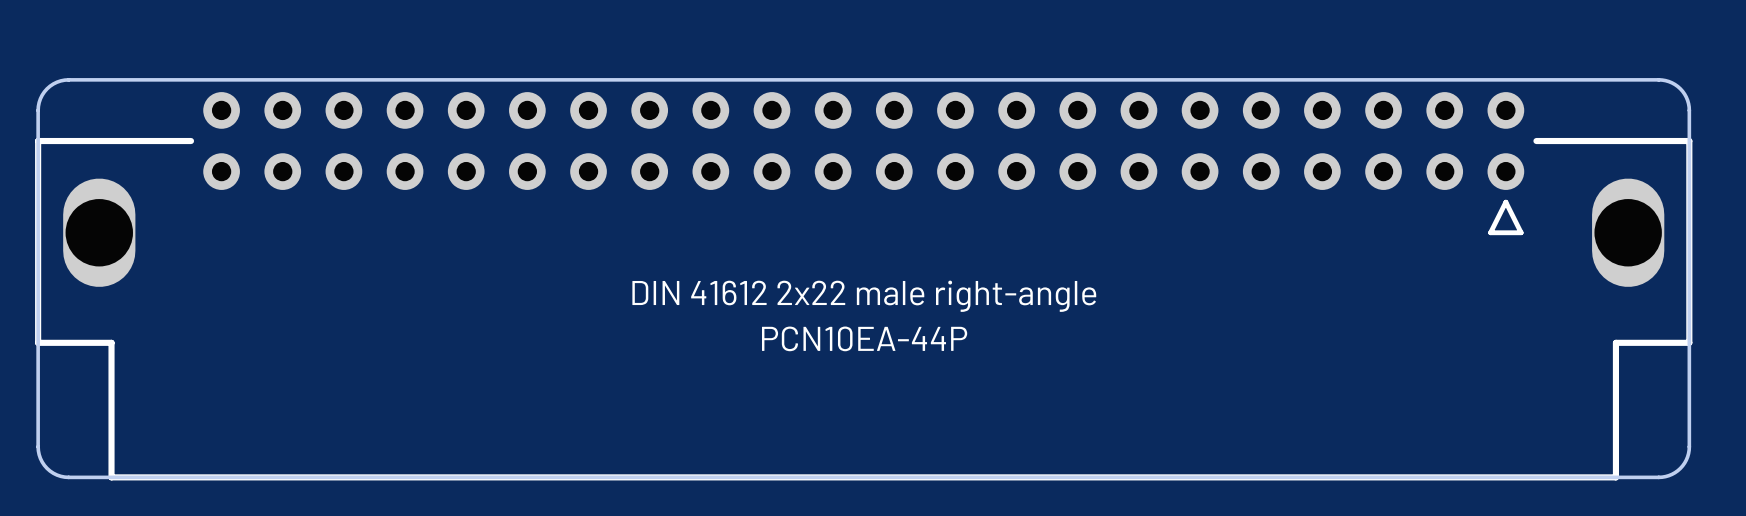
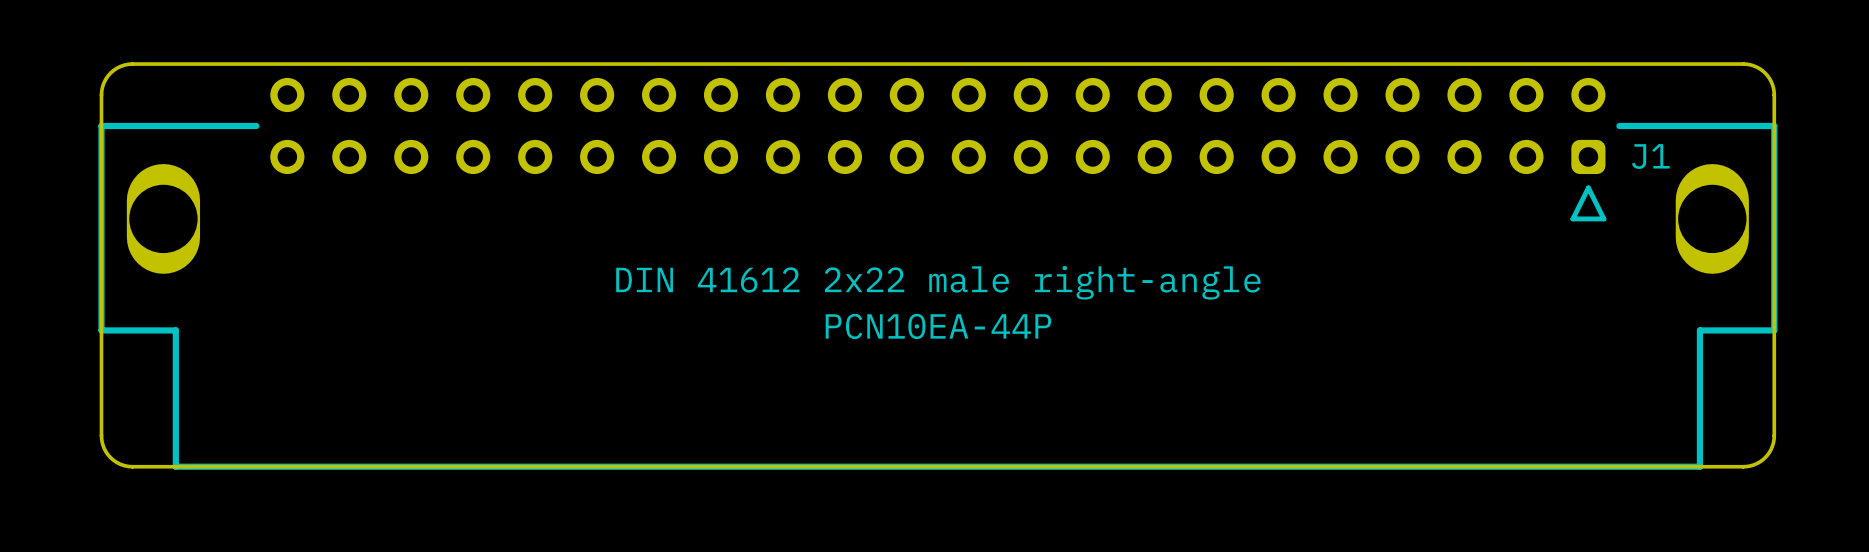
part: DIN 41612 2x22 male right-angle (863, 286) -> none
J1: none -> DIN 41612 2x22 male right-angle (937, 273)

